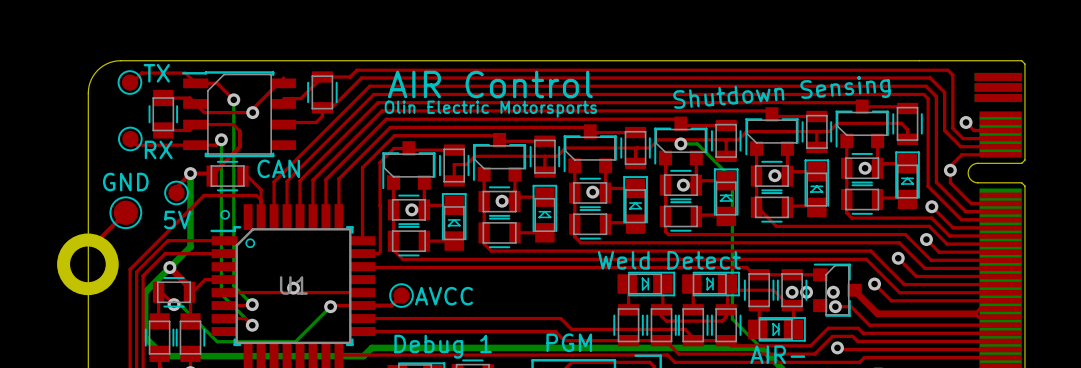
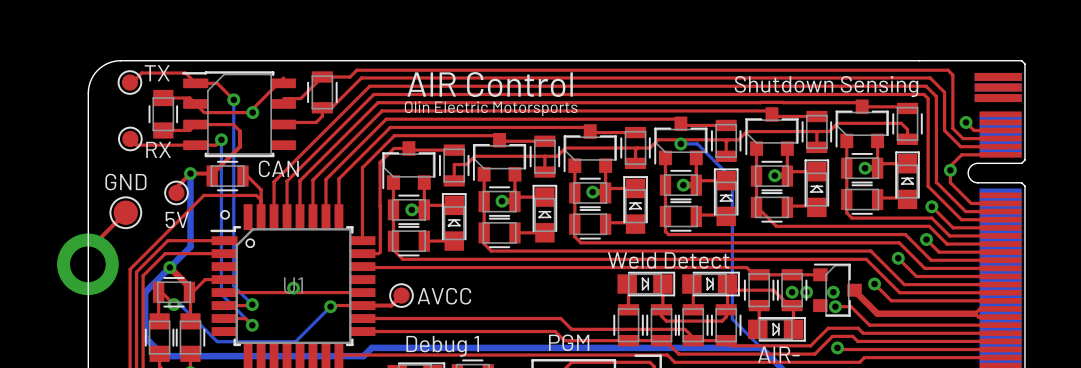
text rotation: 0° (782, 92) -> 4.5° clockwise (826, 86)

